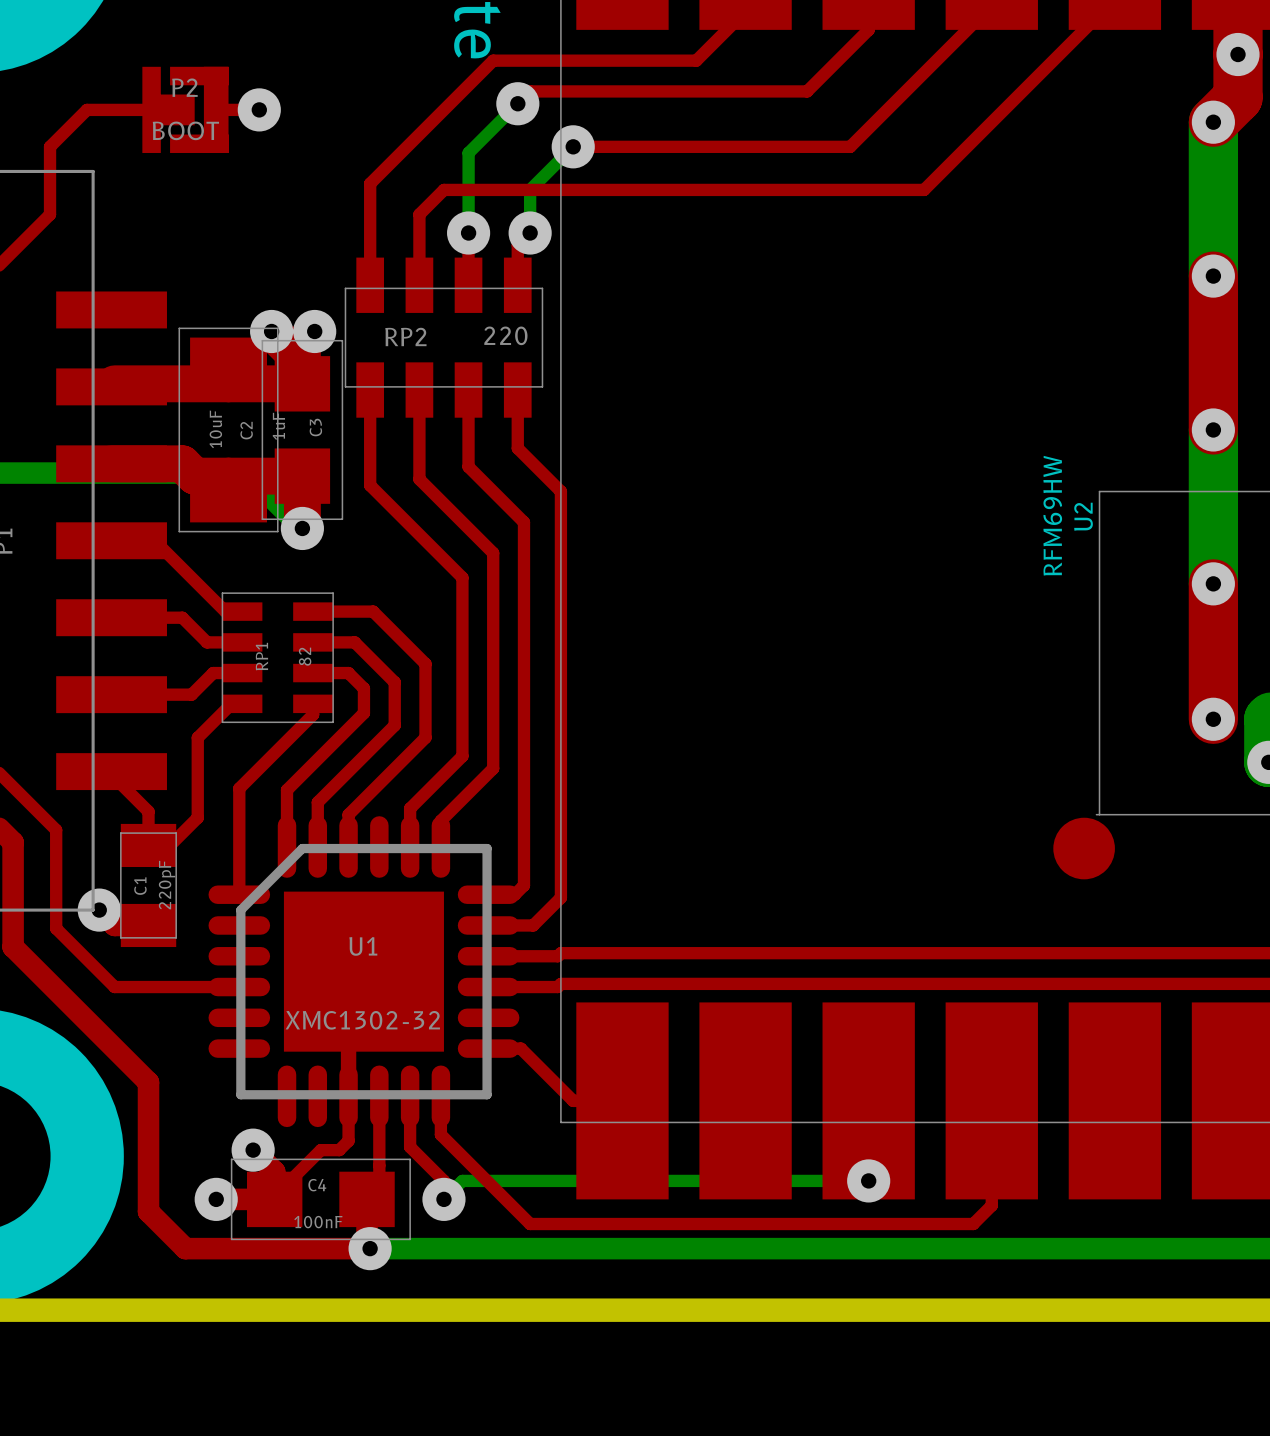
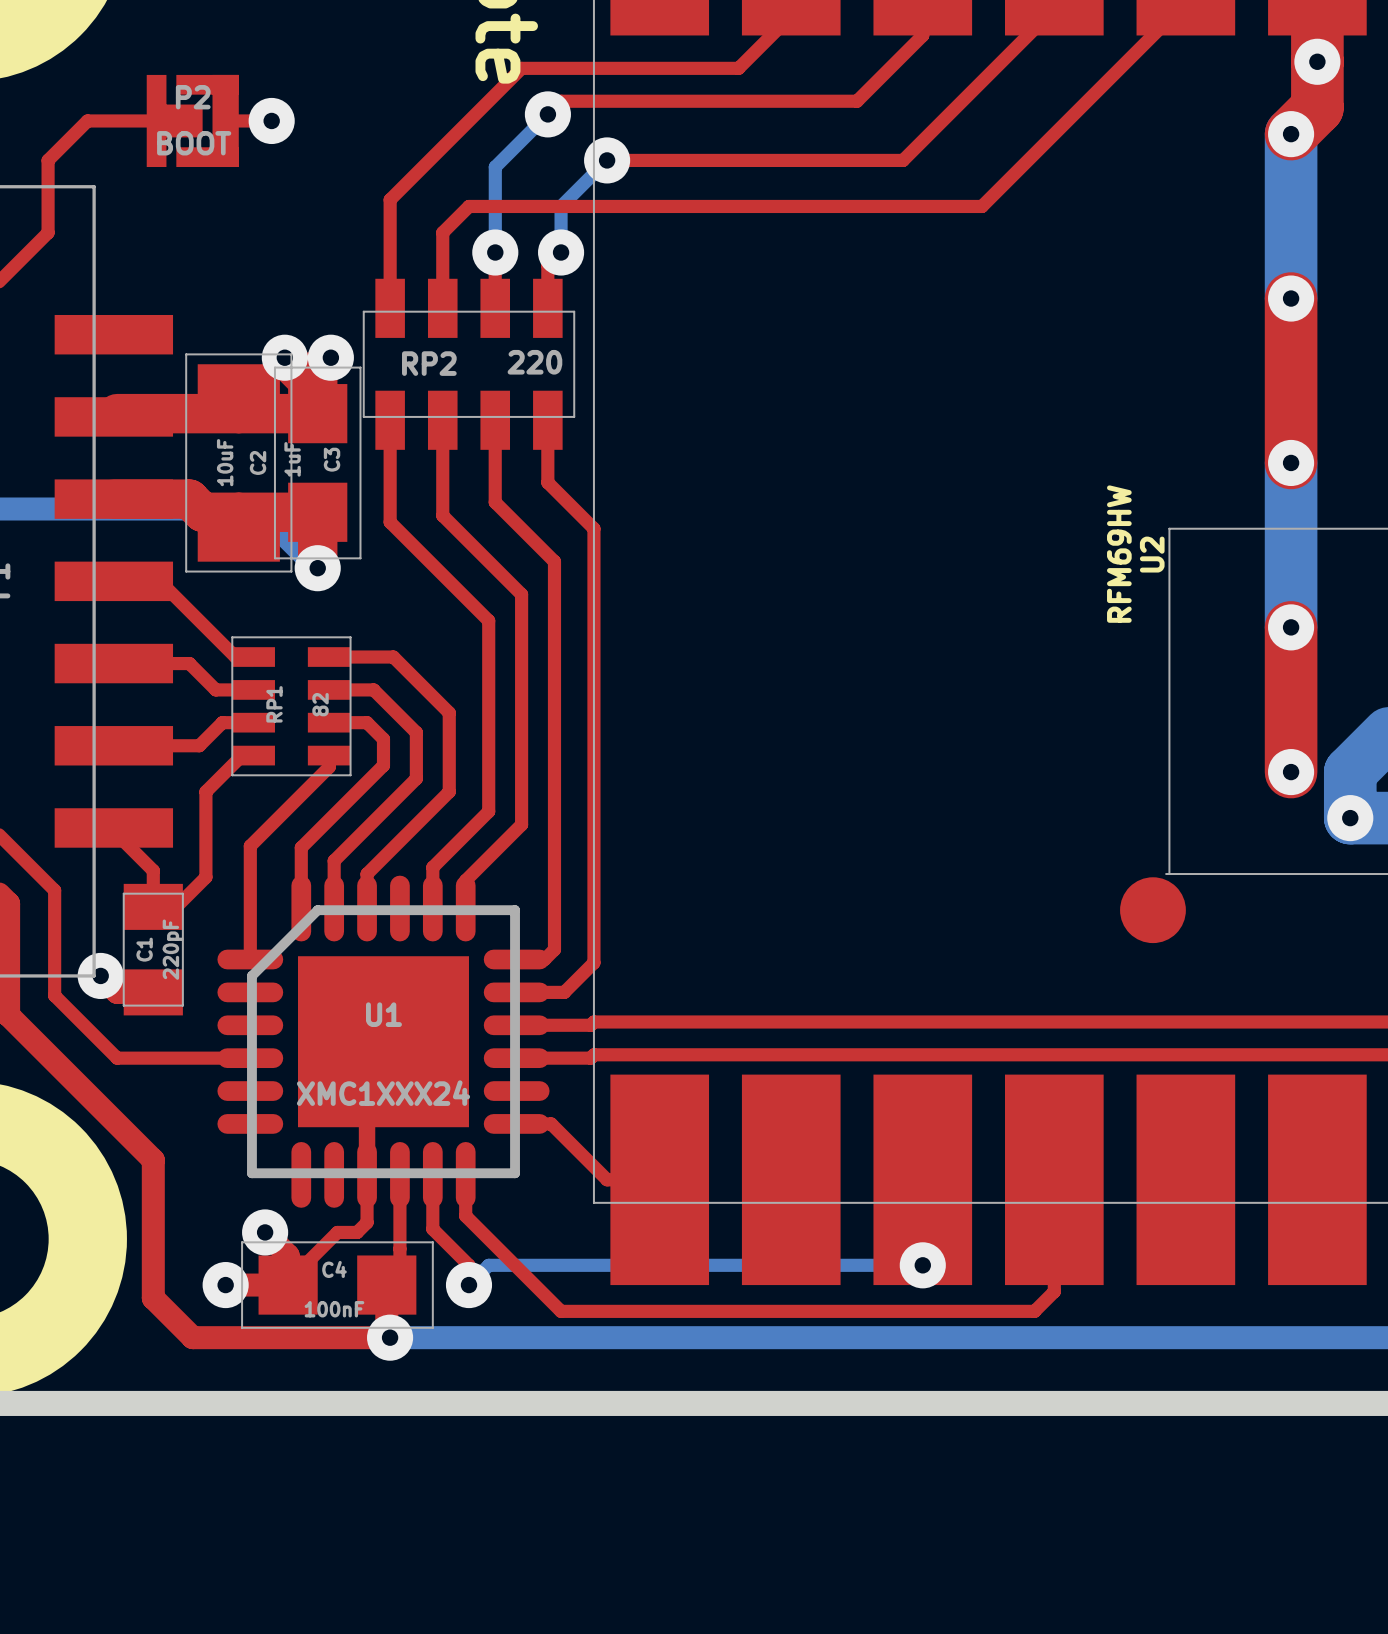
U1 value: XMC1302-32 (362, 1020) -> XMC1XXX24 (383, 1093)

